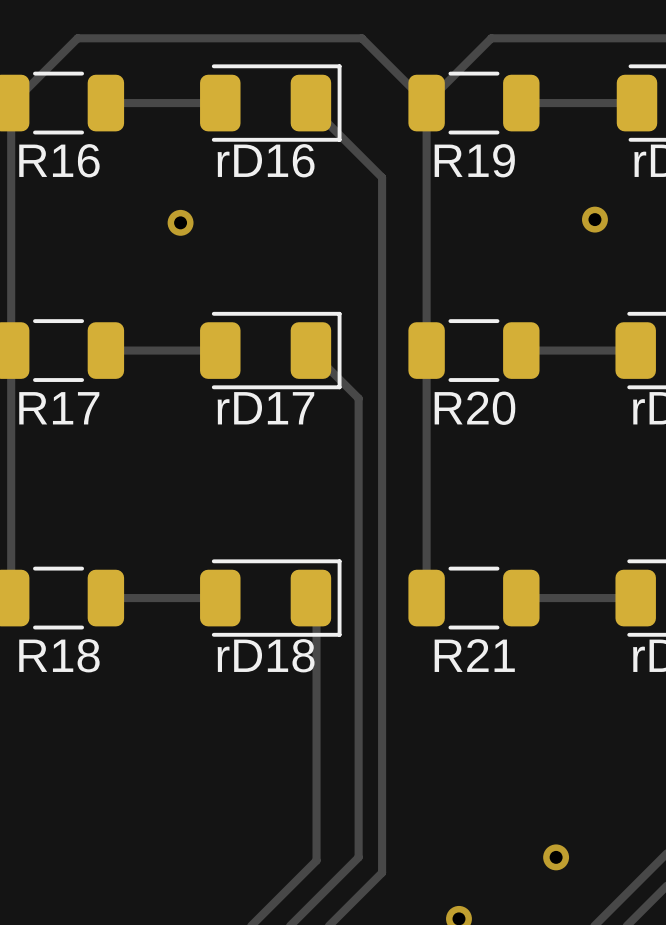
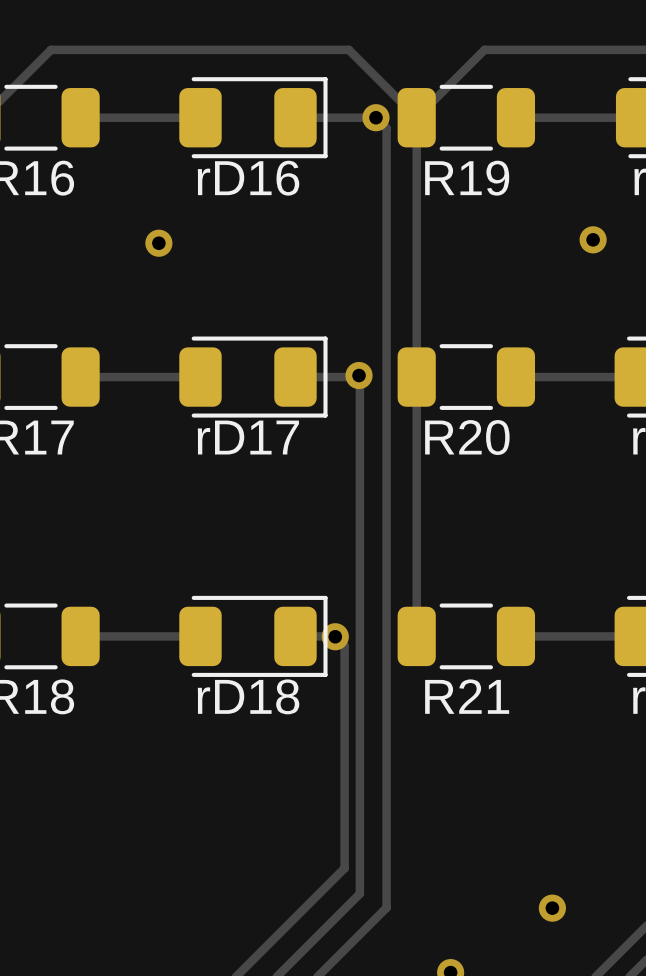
track: (310, 103) (310, 106) (382, 177) (382, 872) -> (295, 117) (375, 117) (386, 128) (386, 907) (370, 924)
via: none -> (375, 117)
via: none -> (359, 375)
track: (310, 350) (358, 398) (358, 857) -> (295, 377) (359, 376) (359, 893) (345, 908)
via: none -> (335, 636)
track: (316, 610) (316, 860) -> (295, 636) (334, 636) (344, 646) (344, 868) (301, 911)

